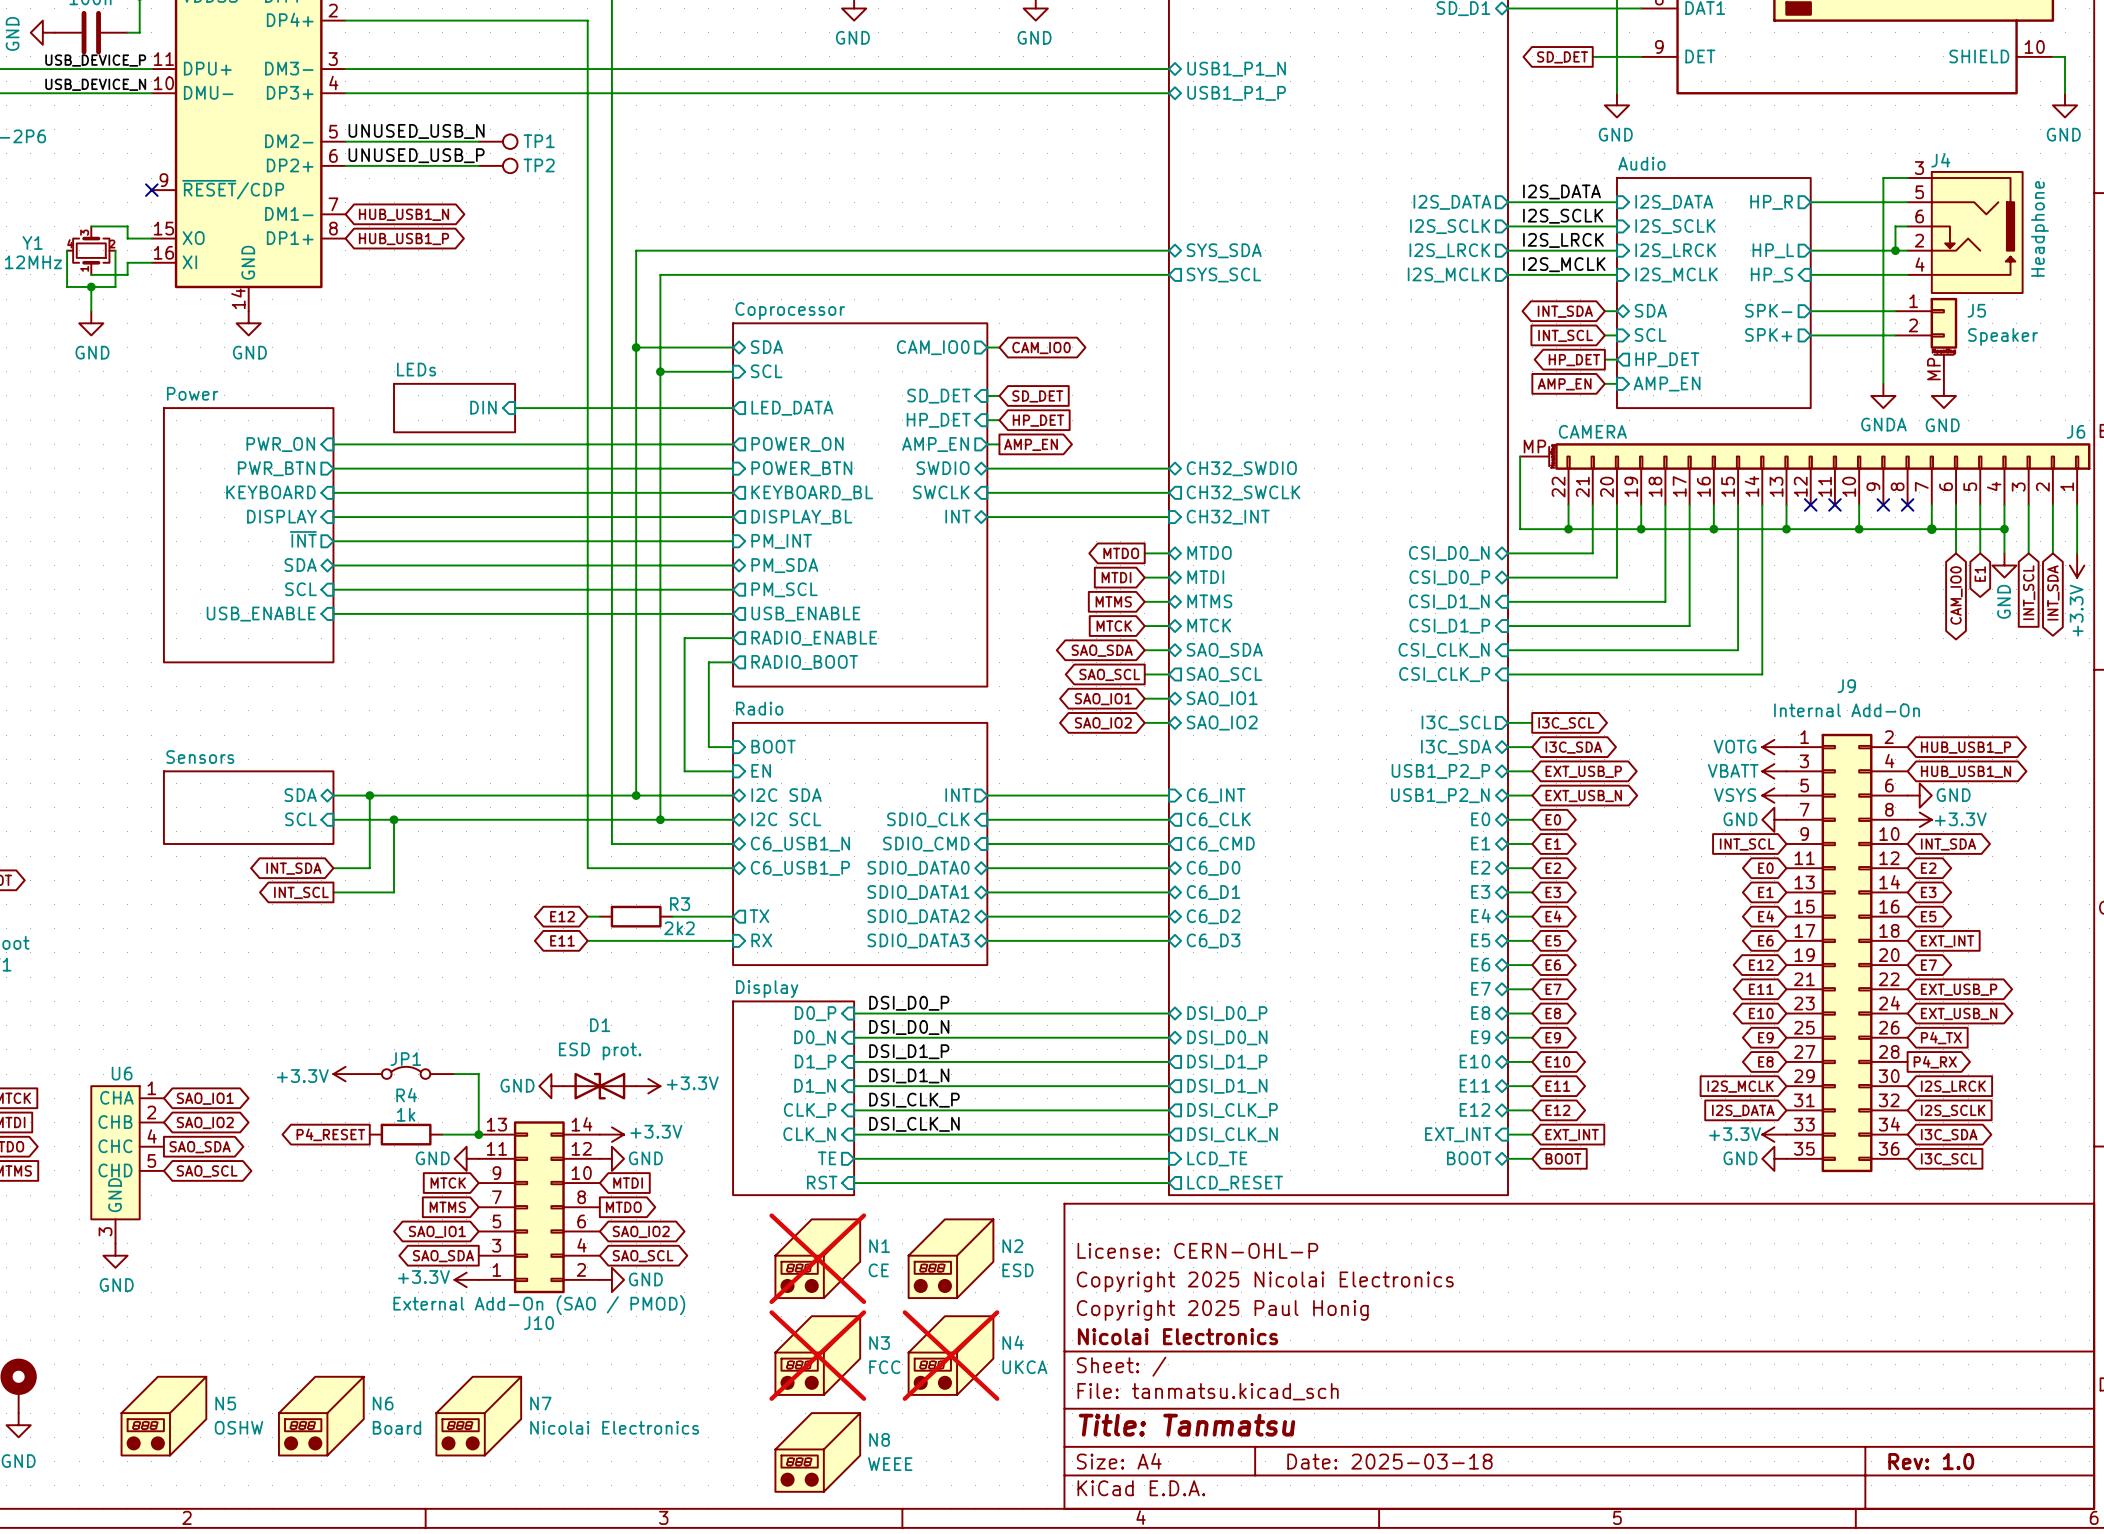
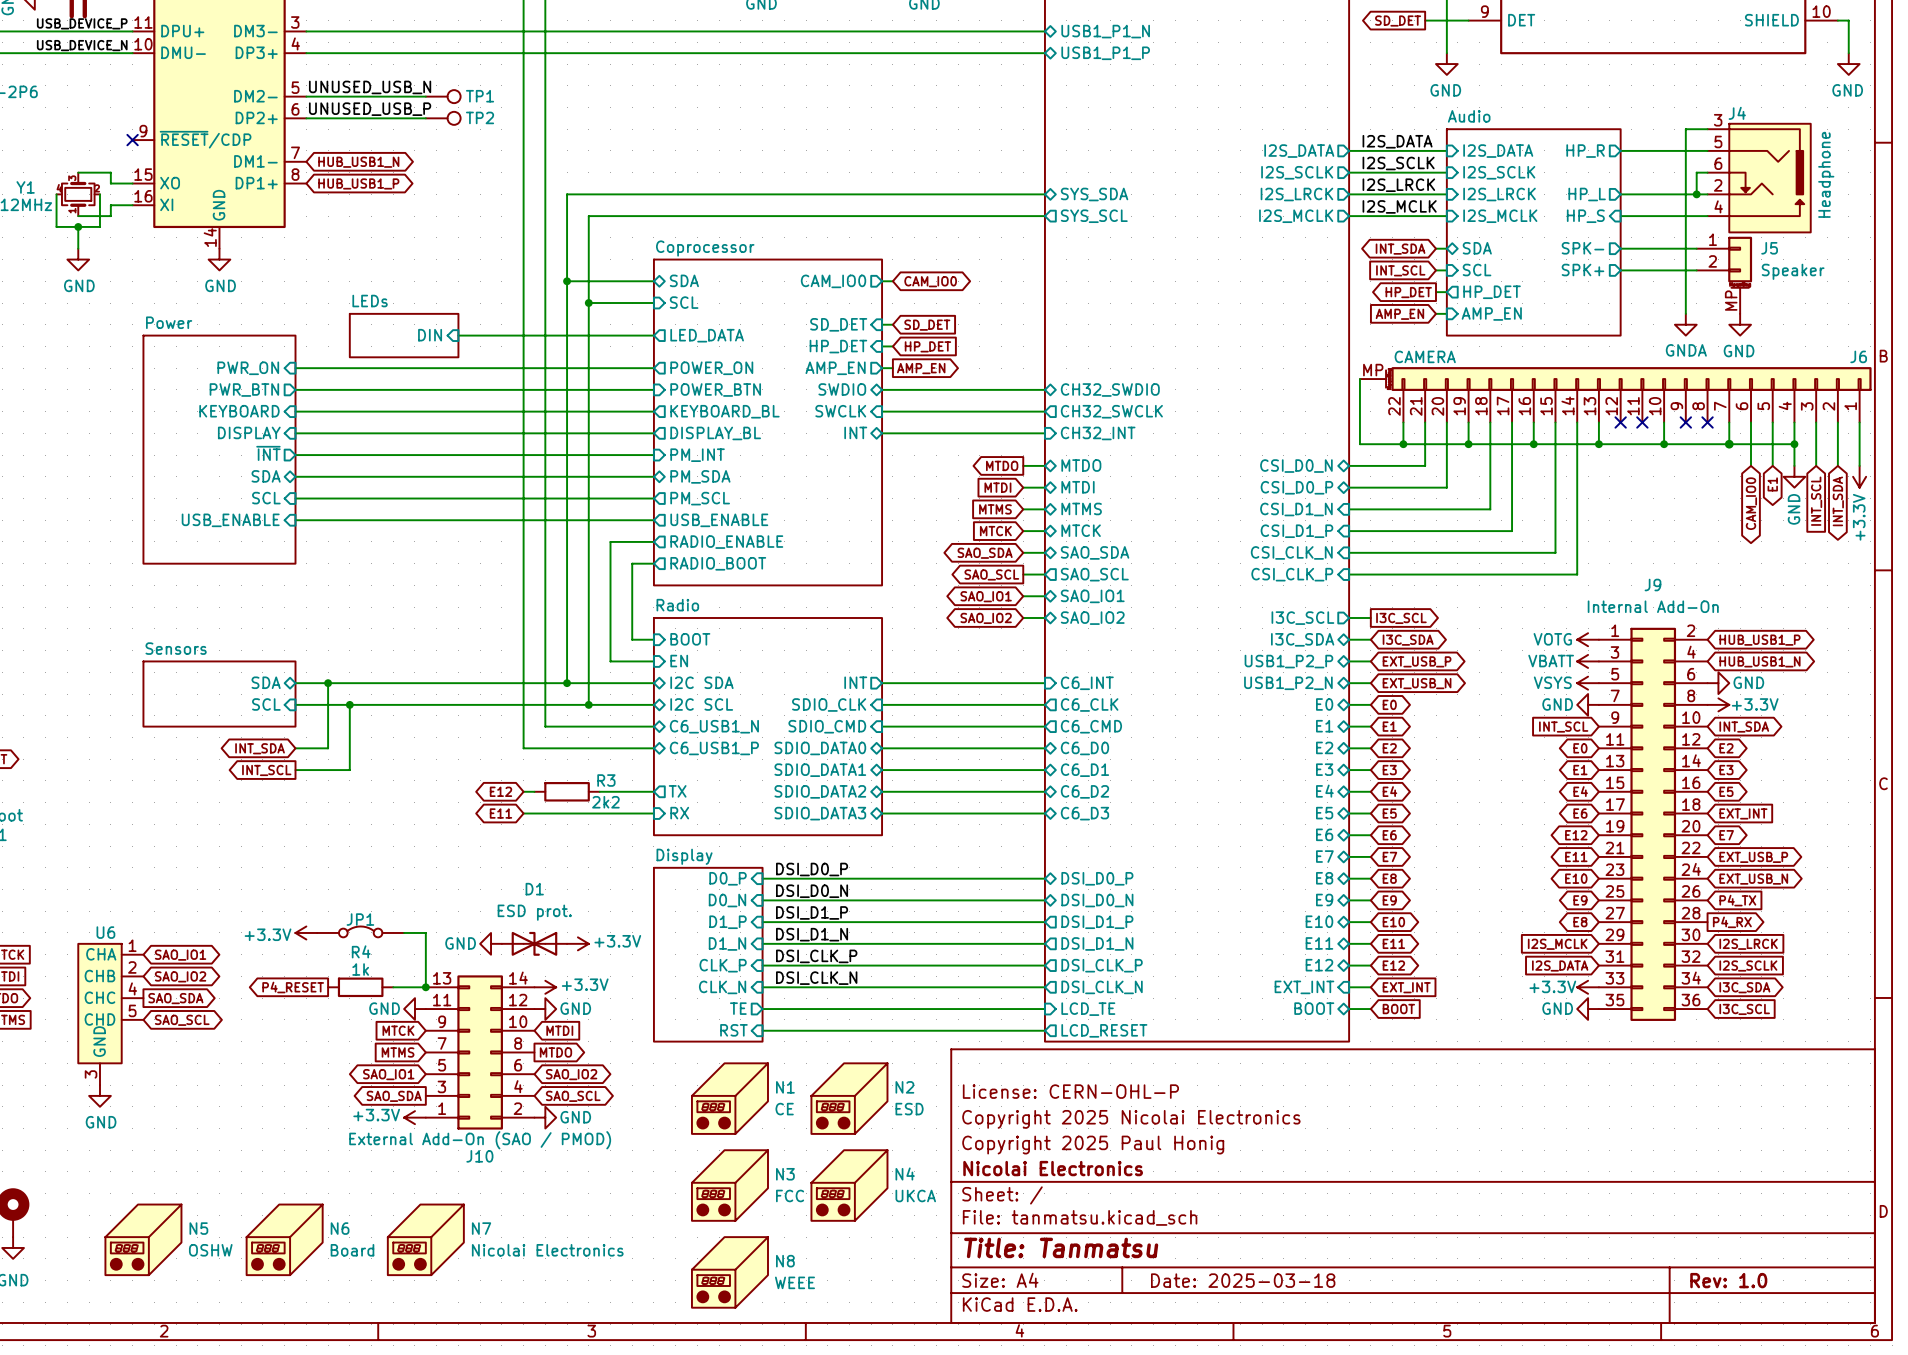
N1 do-not-place cross: (817, 1258) -> none
N3 do-not-place cross: (817, 1355) -> none
N4 do-not-place cross: (951, 1355) -> none

